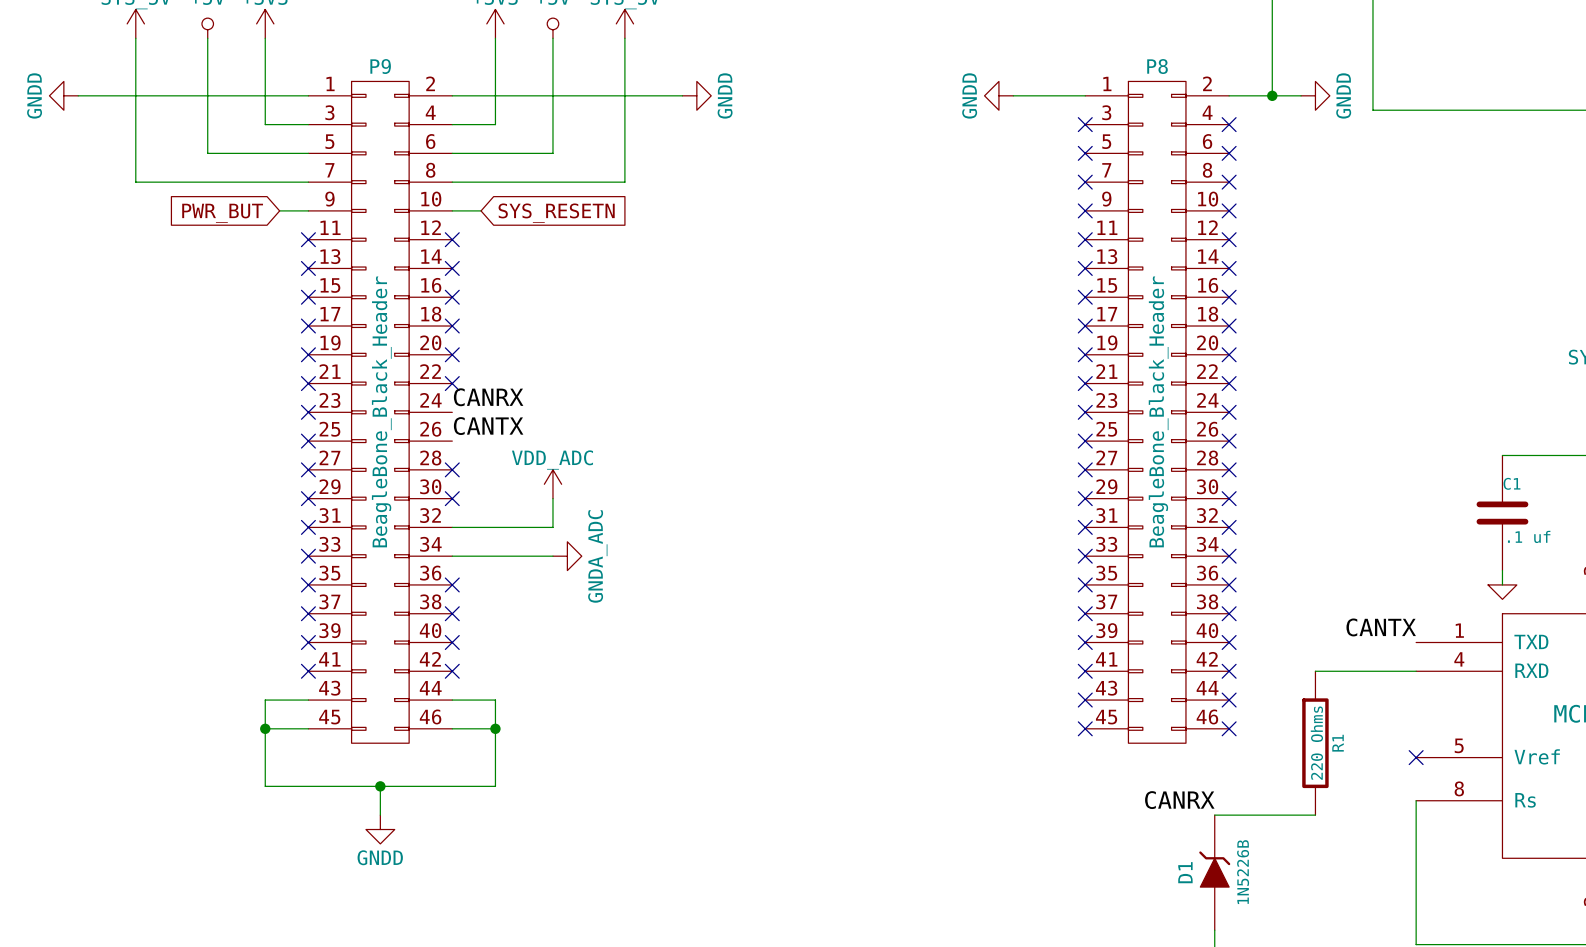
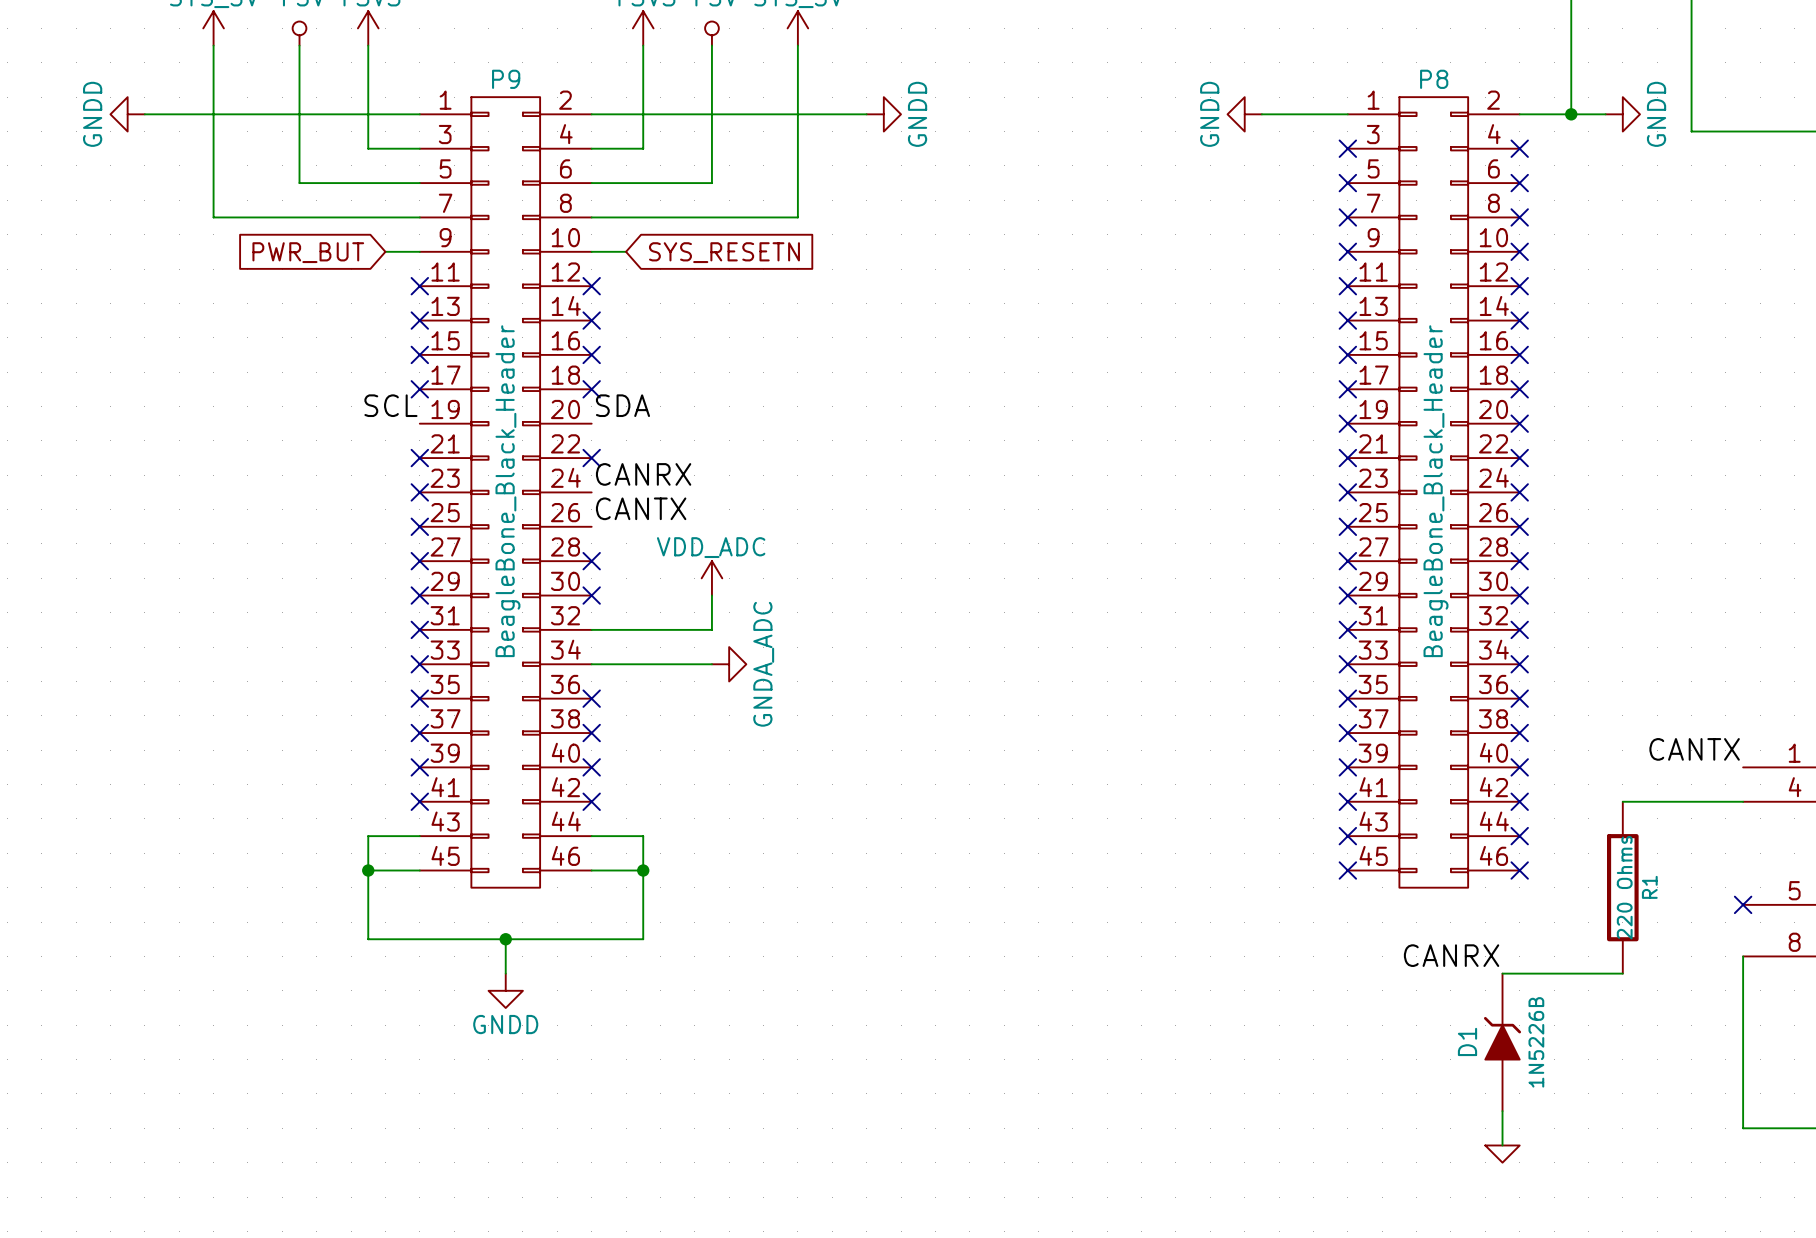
label: none -> SCL (390, 405)
label: none -> SDA (622, 405)
no-connect mark: (308, 354) -> none
no-connect mark: (452, 354) -> none

